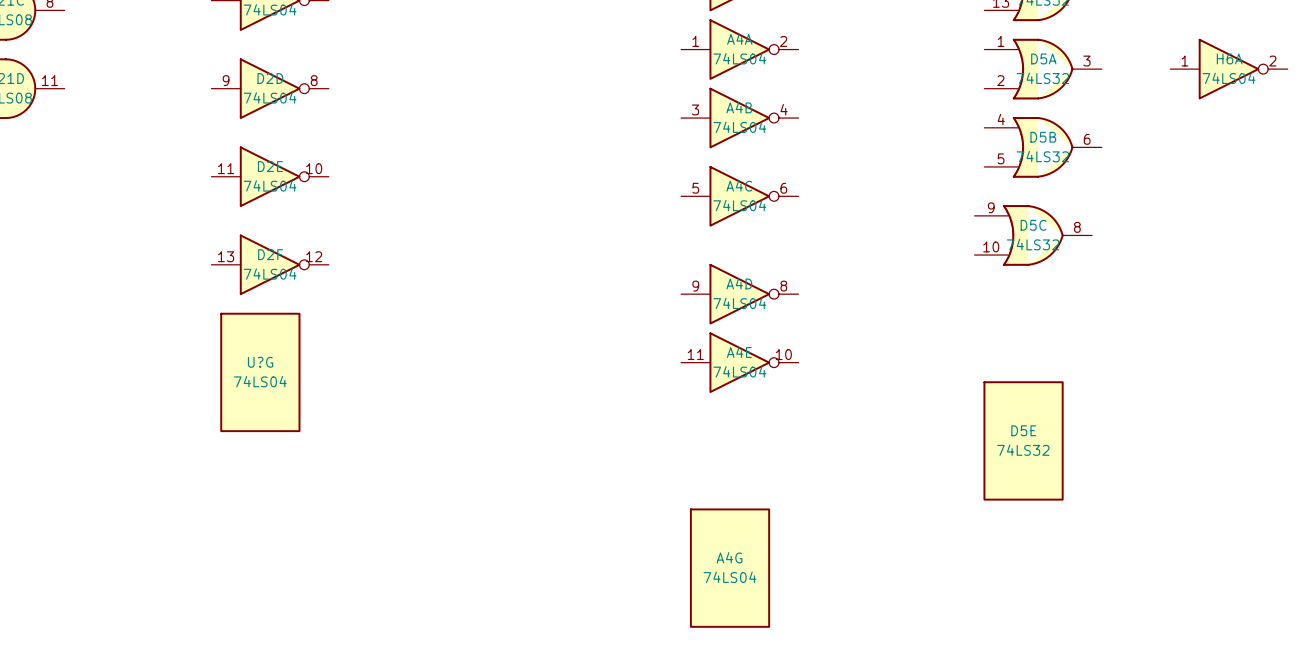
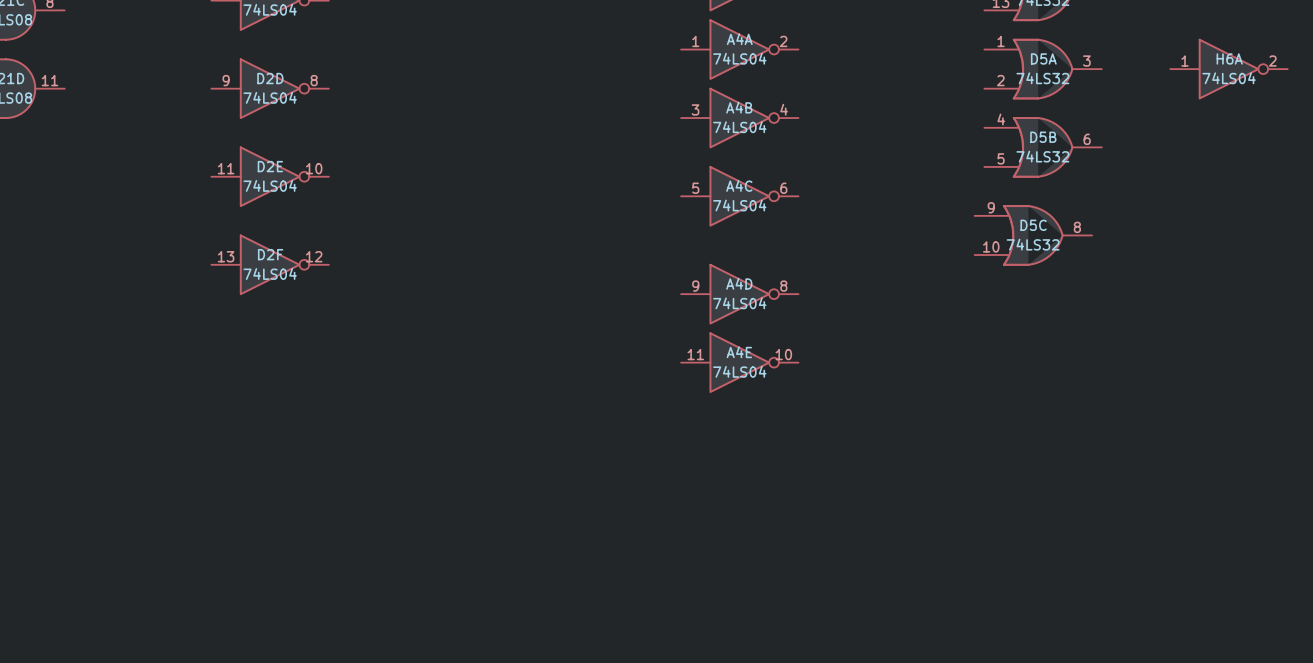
U?G: 74LS04 (260, 372) -> none
D5E: 74LS32 (1023, 440) -> none
A4G: 74LS04 (730, 568) -> none

